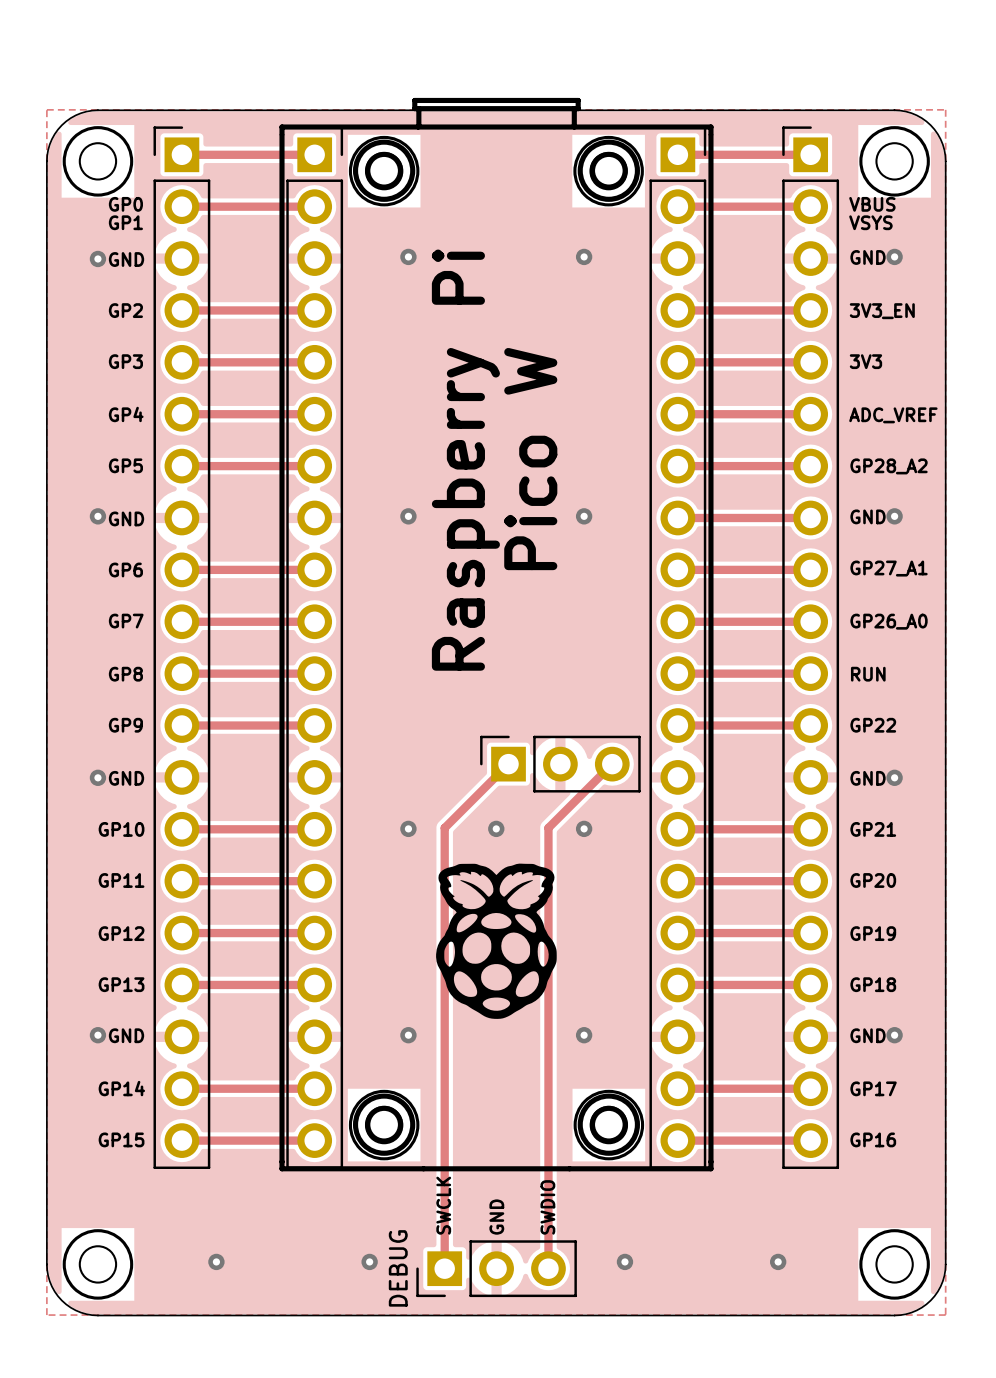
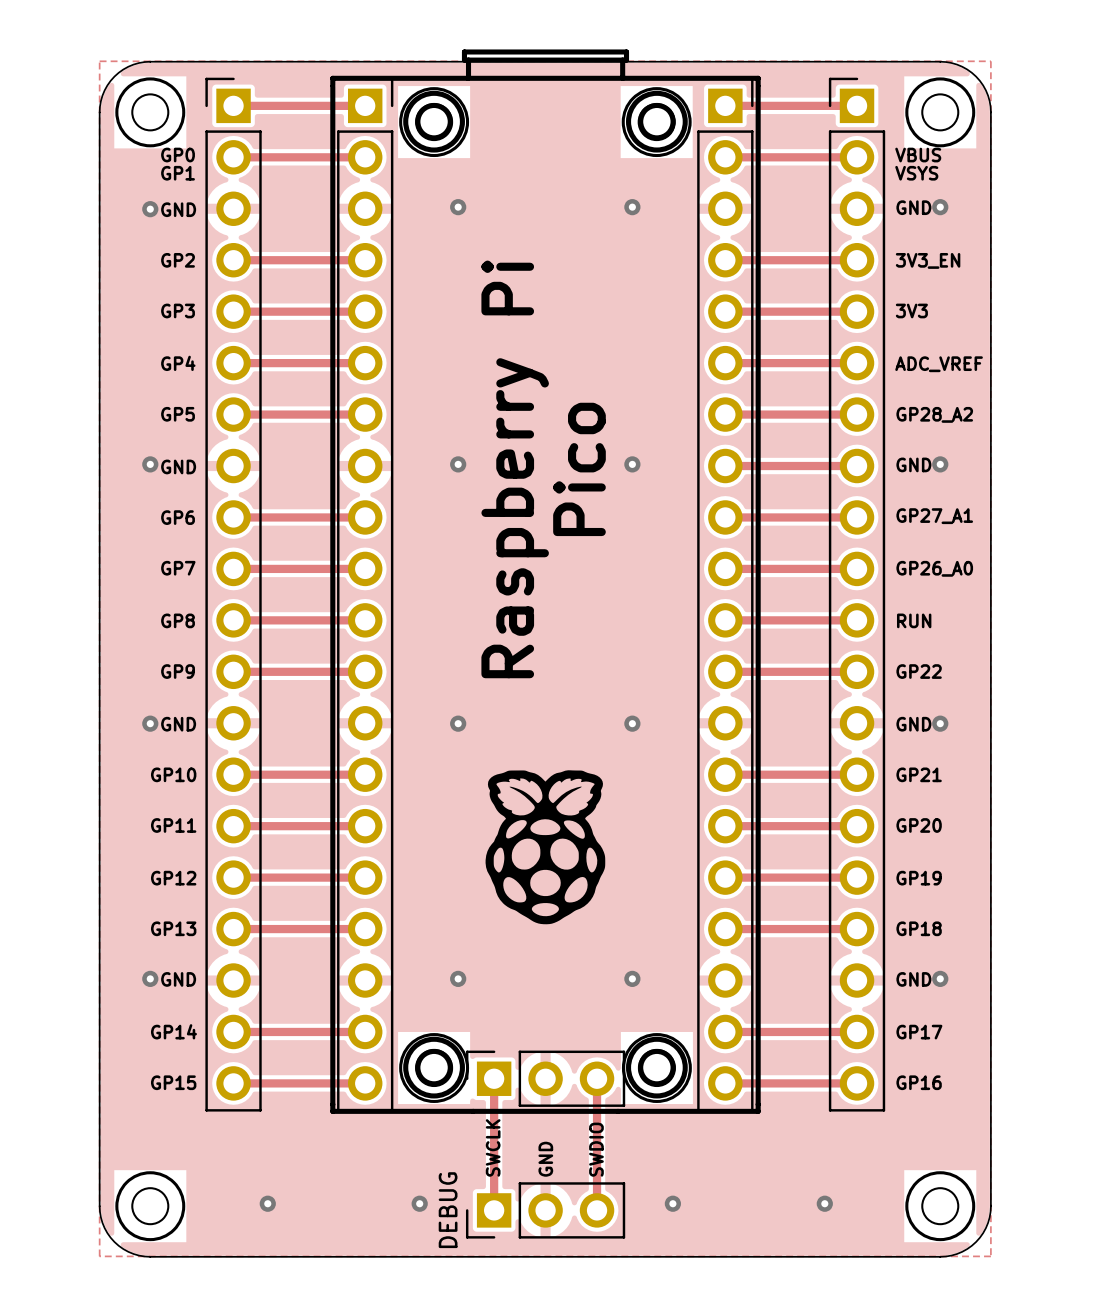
text: Pico W (530, 459) -> Pico (579, 469)
text position: Raspberry Pi (465, 460) -> Raspberry Pi (515, 469)
track: (508, 764) (444, 827) (444, 1135) -> none
part position: (560, 764) -> (545, 1078)
track: (612, 764) (548, 827) (548, 1135) -> none
via: none -> (458, 723)
via: none -> (632, 723)
via: (408, 828) -> none
via: (496, 828) -> none
via: (584, 828) -> none
drawing position: (496, 941) -> (545, 847)

